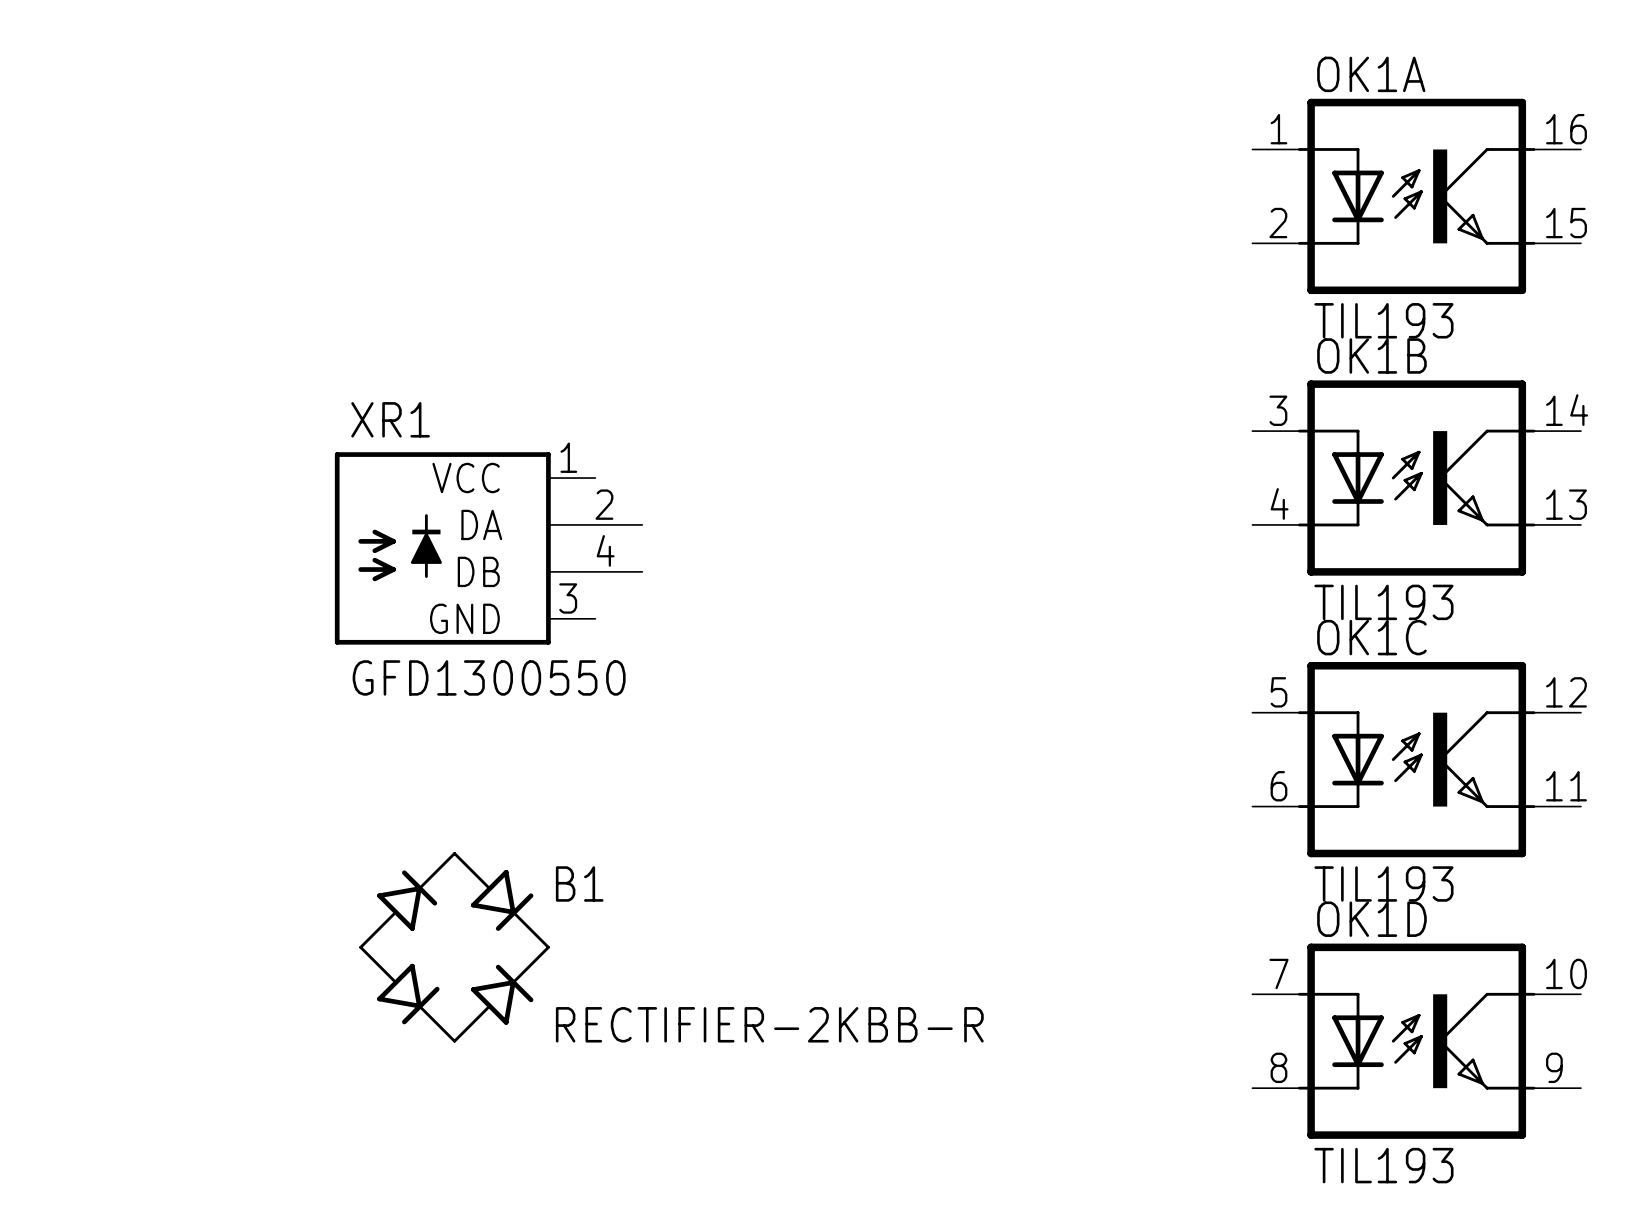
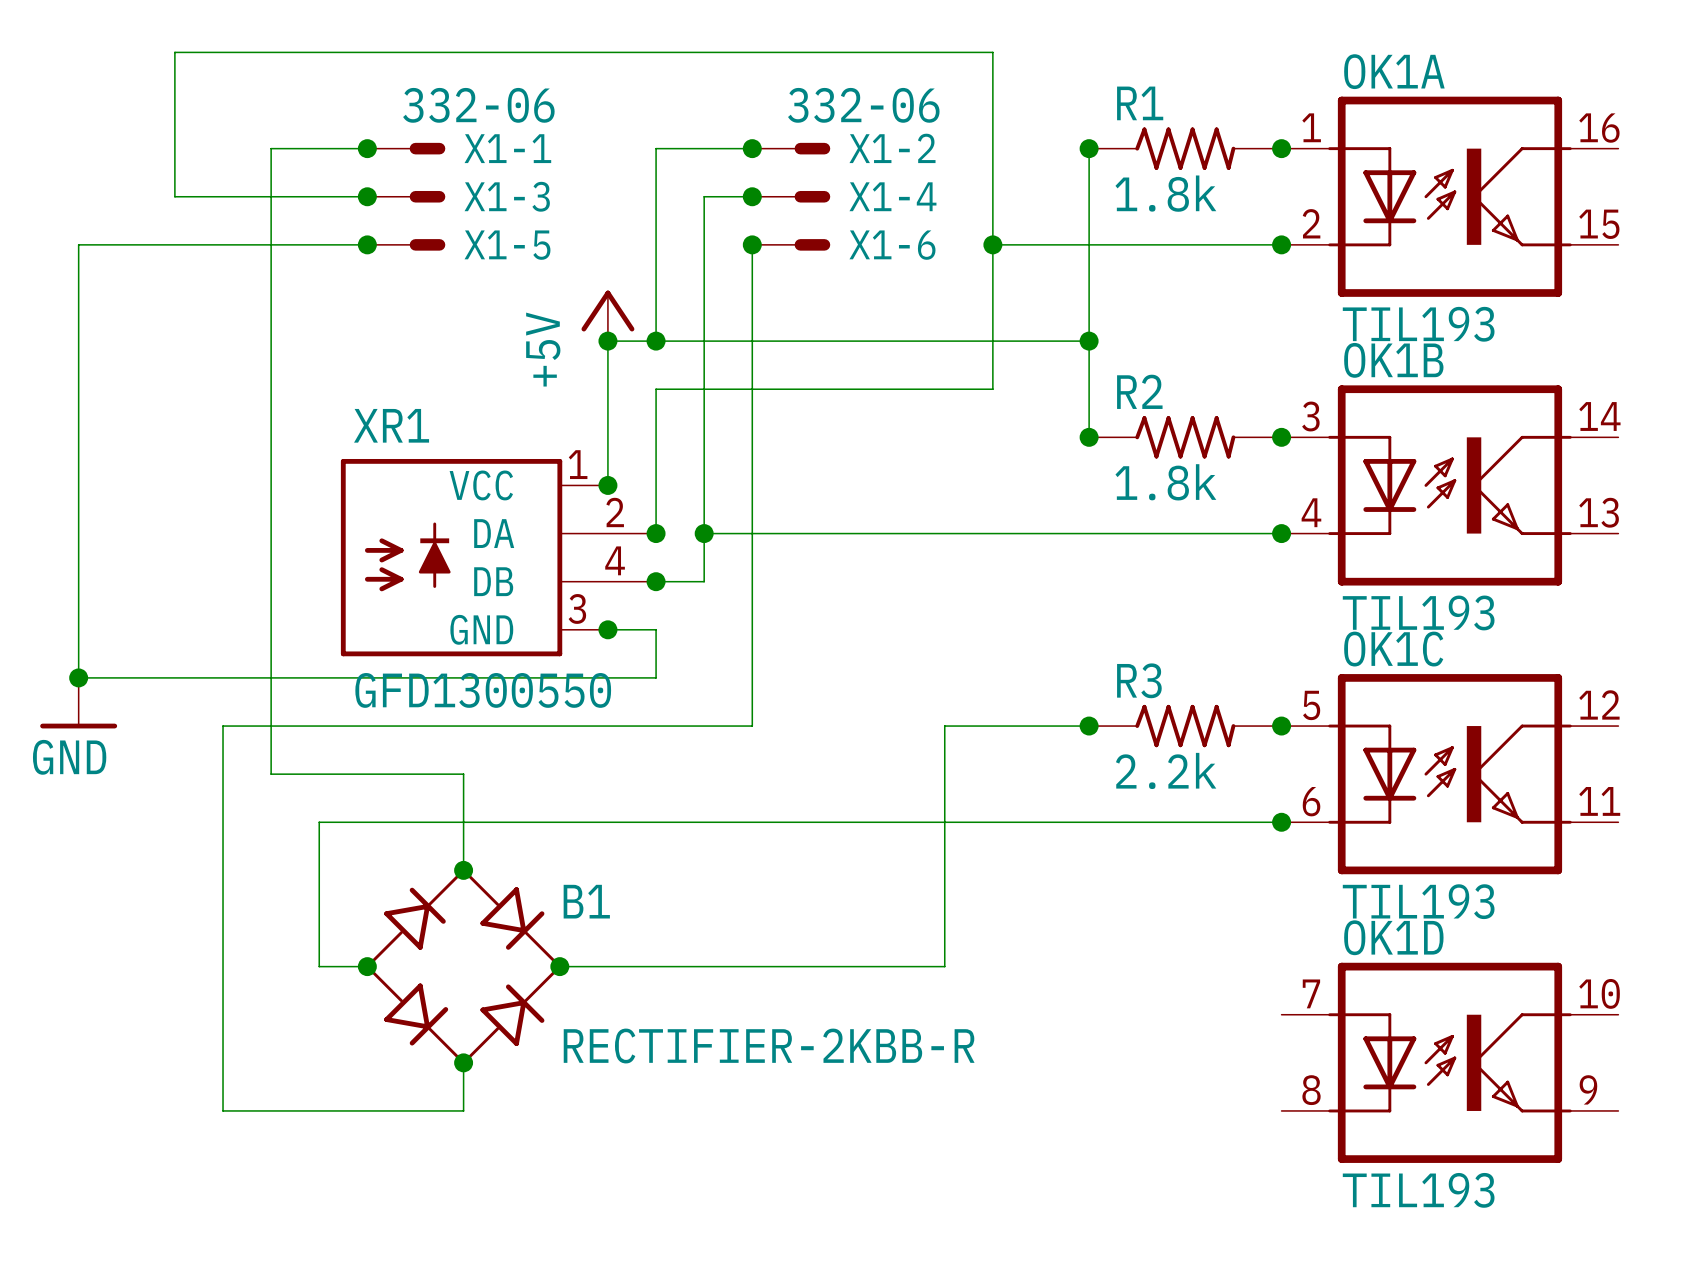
wire: none -> (367, 148) (271, 148) (271, 774) (463, 774) (463, 870)
junction: none -> (367, 148)
X1-1: none -> 332-06 (406, 148)
wire: none -> (752, 148) (656, 148) (656, 341)
junction: none -> (752, 148)
X1-2: none -> 332-06 (791, 148)
wire: none -> (1089, 148) (1089, 437)
junction: none -> (1089, 148)
R1: none -> 1.8k (1185, 148)
junction: none -> (1281, 148)
wire: none -> (367, 196) (174, 196) (174, 52) (992, 52) (992, 389) (656, 389) (656, 533)
junction: none -> (367, 196)
X1-3: none -> (406, 196)
wire: none -> (752, 196) (704, 196) (704, 581) (656, 581)
junction: none -> (752, 196)
X1-4: none -> (791, 196)
wire: none -> (367, 244) (78, 244) (78, 677) (656, 677) (656, 629) (607, 629)
junction: none -> (367, 244)
X1-5: none -> (406, 244)
wire: none -> (752, 244) (752, 726) (223, 726) (223, 1110) (463, 1110) (463, 1062)
junction: none -> (752, 244)
X1-6: none -> (791, 244)
wire: none -> (992, 244) (1281, 244)
junction: none -> (992, 244)
junction: none -> (1281, 244)
power symbol: none -> +5V (607, 315)
junction: none -> (607, 341)
junction: none -> (656, 341)
wire: none -> (1089, 341) (607, 341) (607, 485)
junction: none -> (1089, 341)
junction: none -> (1089, 437)
R2: none -> 1.8k (1185, 437)
junction: none -> (1281, 437)
junction: none -> (607, 485)
junction: none -> (656, 533)
wire: none -> (704, 533) (1281, 533)
junction: none -> (704, 533)
junction: none -> (1281, 533)
junction: none -> (656, 581)
junction: none -> (607, 629)
junction: none -> (78, 677)
power symbol: none -> GND (78, 703)
wire: none -> (1089, 726) (944, 726) (944, 966) (559, 966)
junction: none -> (1089, 726)
R3: none -> 2.2k (1185, 726)
junction: none -> (1281, 726)
wire: none -> (1281, 822) (319, 822) (319, 966) (367, 966)
junction: none -> (1281, 822)
junction: none -> (463, 870)
junction: none -> (367, 966)
junction: none -> (559, 966)
junction: none -> (463, 1062)

